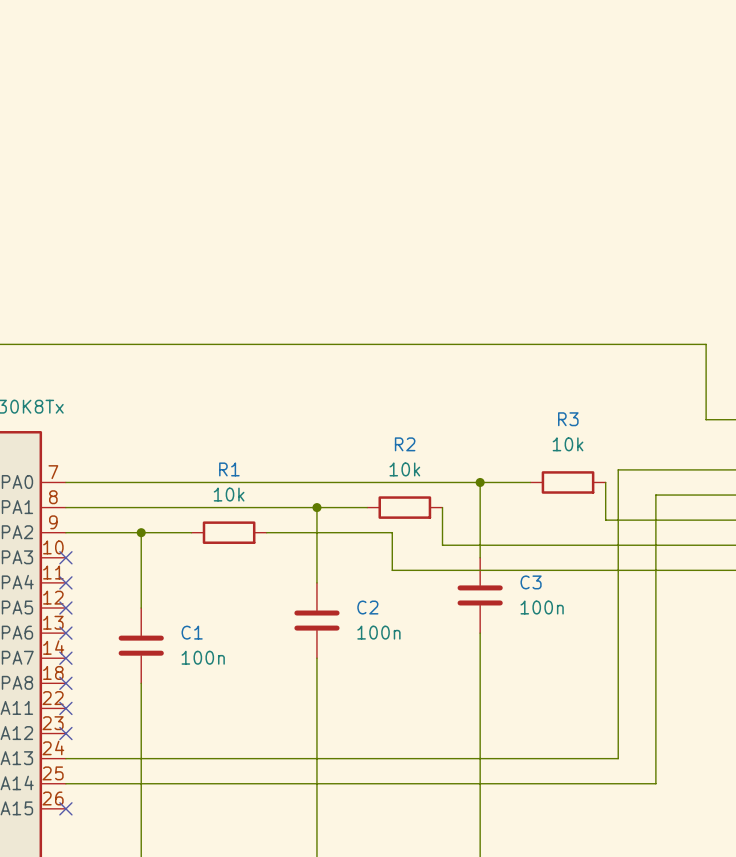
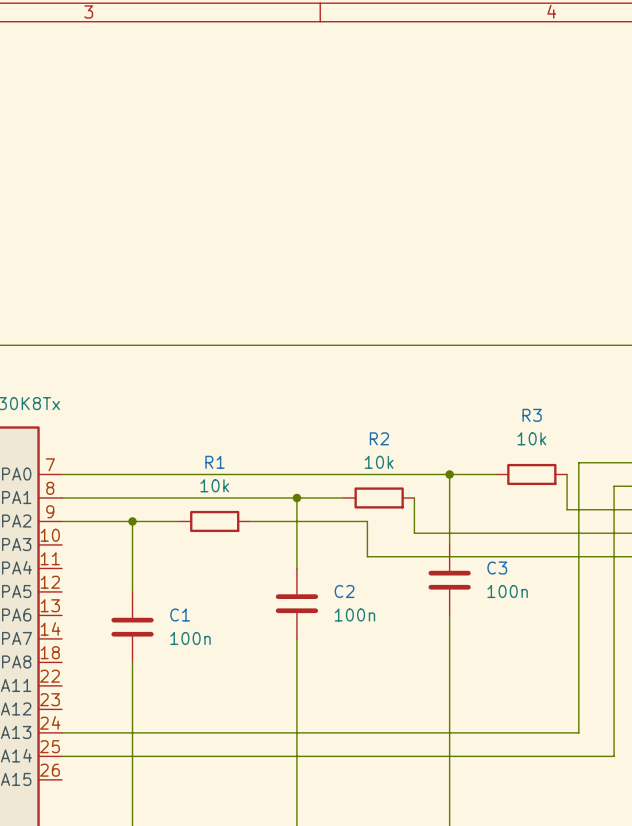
no-connect mark: (65, 557) -> none
no-connect mark: (65, 582) -> none
no-connect mark: (65, 608) -> none
no-connect mark: (65, 633) -> none
no-connect mark: (65, 658) -> none
no-connect mark: (65, 683) -> none
no-connect mark: (65, 708) -> none
no-connect mark: (65, 733) -> none
no-connect mark: (65, 808) -> none

